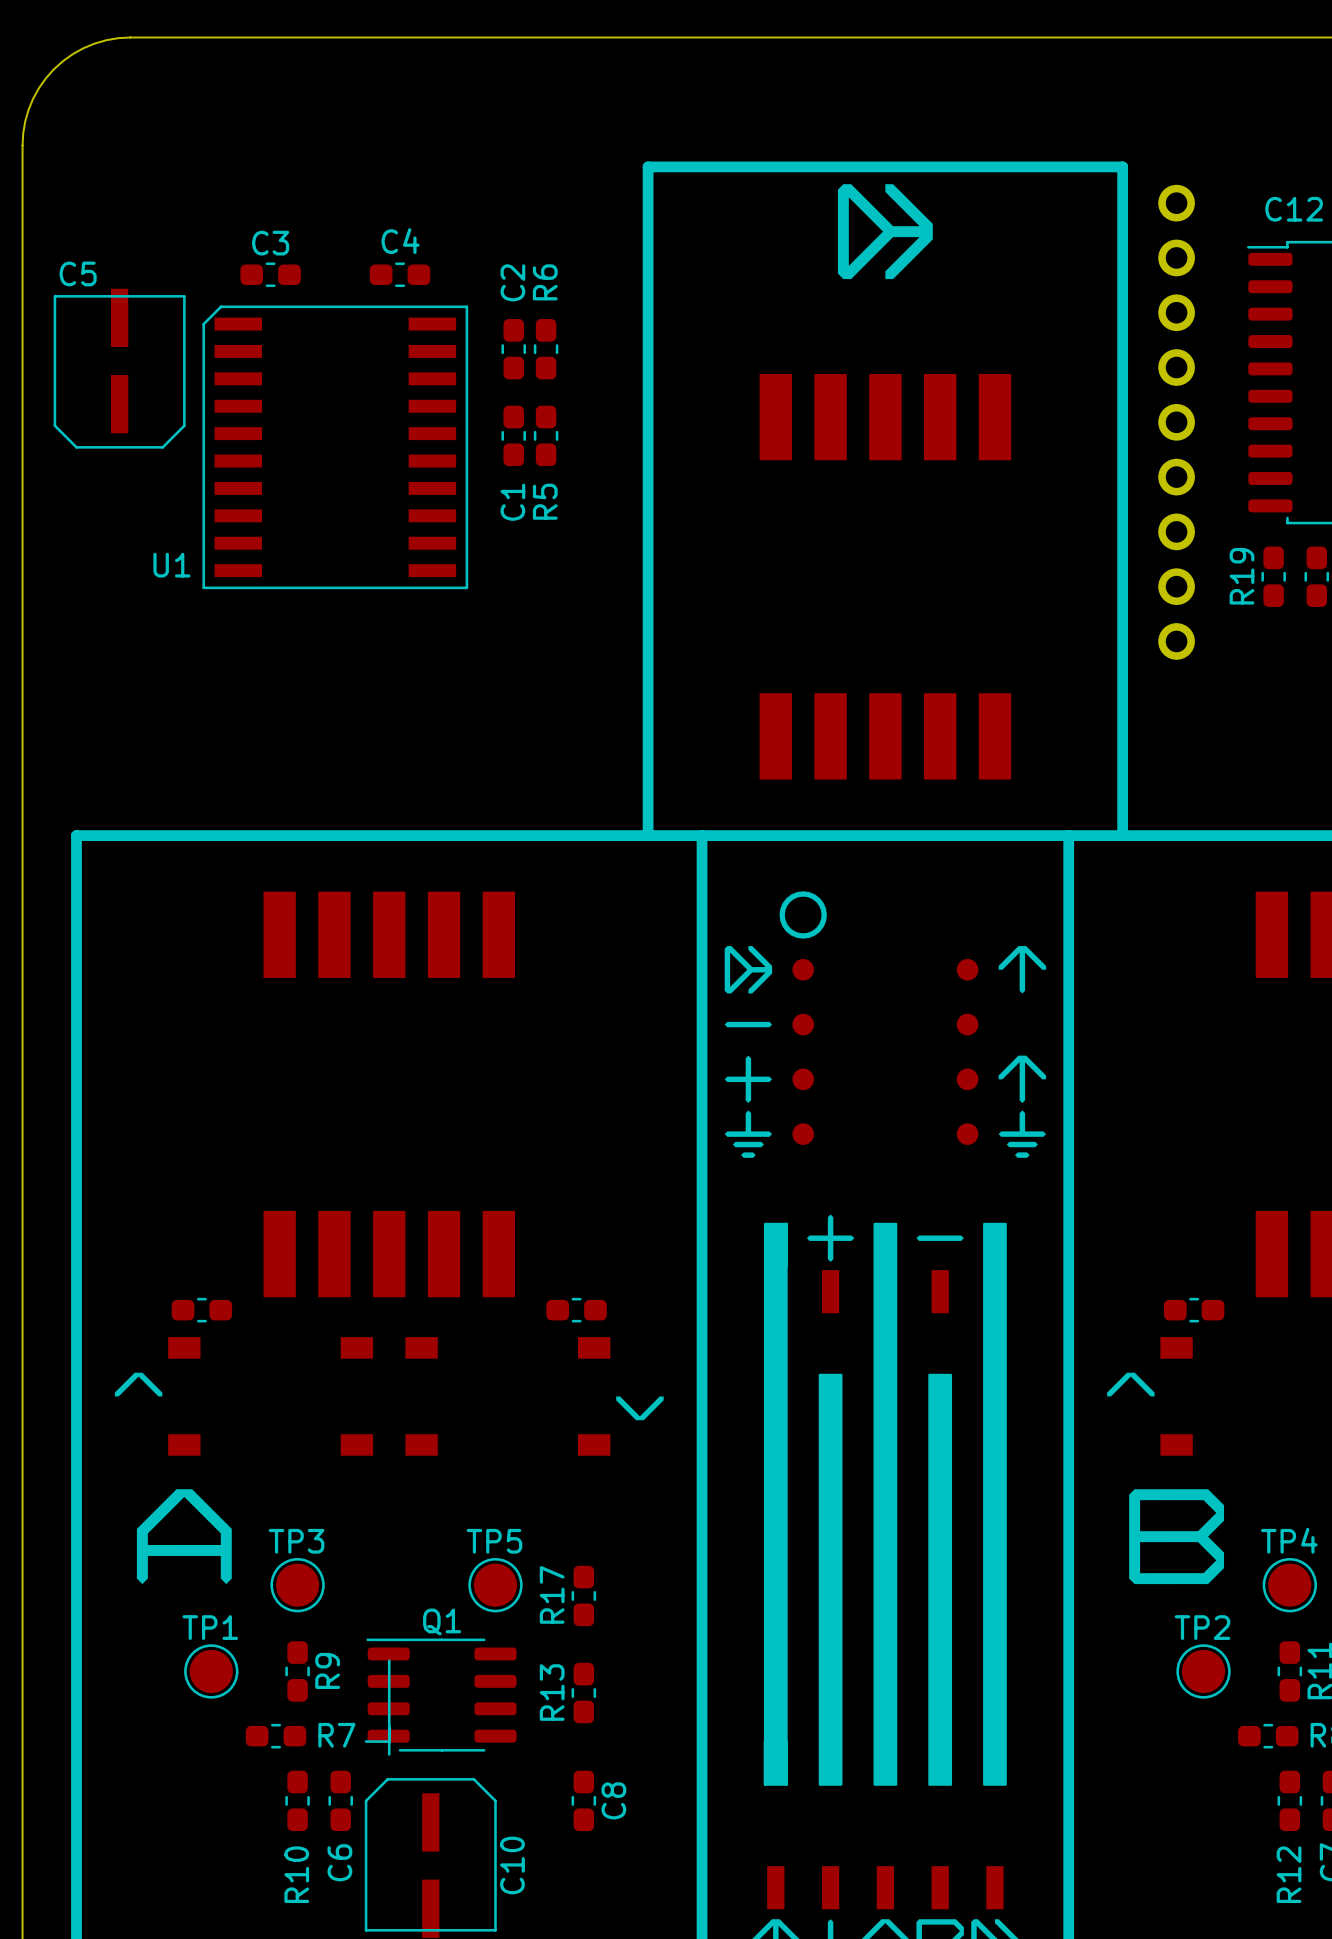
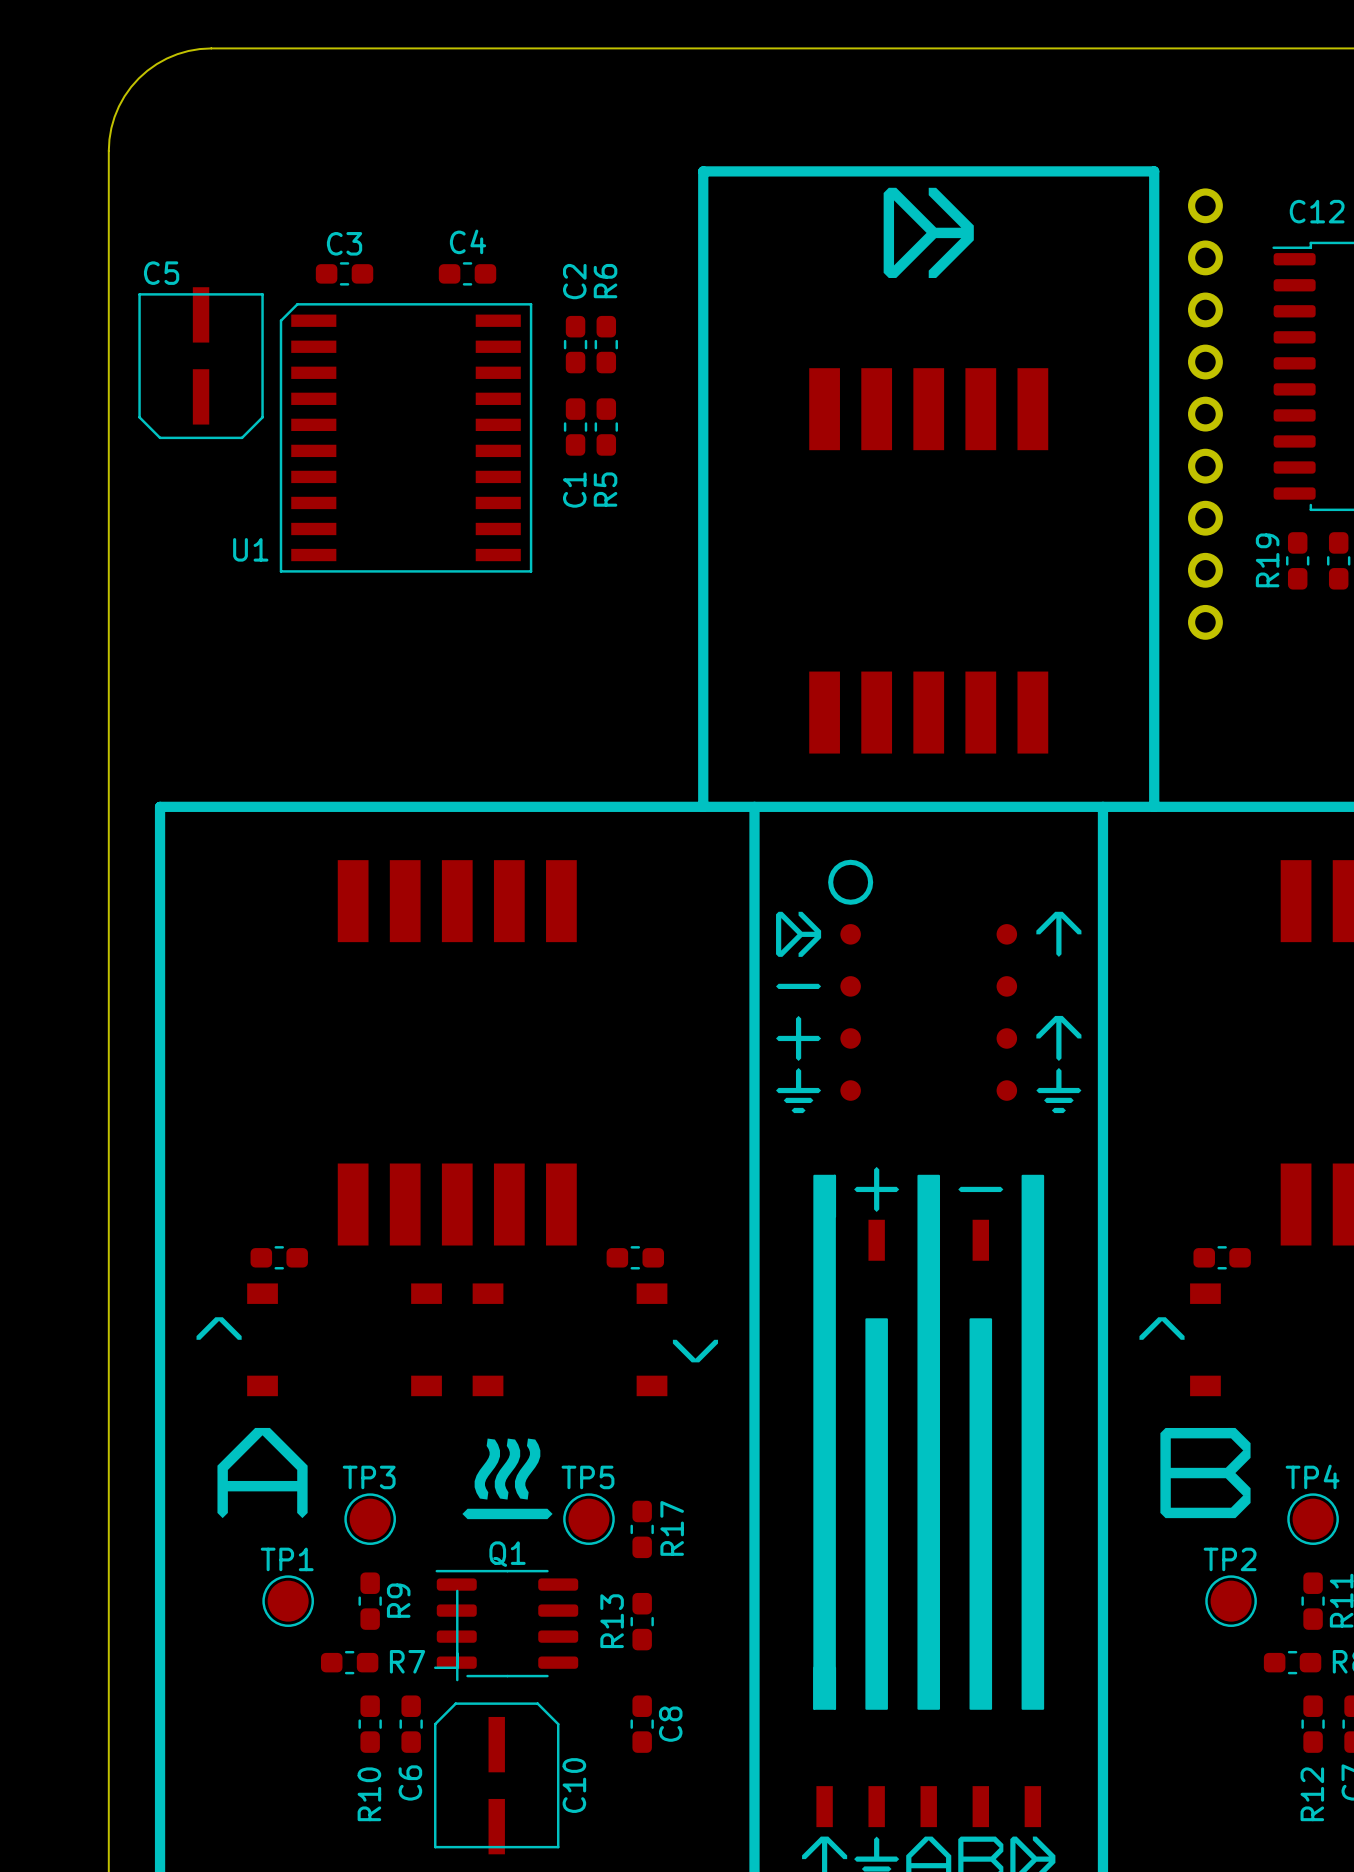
drawing: none -> [462, 1438, 553, 1520]
TP5 position: (495, 1585) -> (588, 1519)
R17 name position: R17 (552, 1594) -> R17 (672, 1528)

